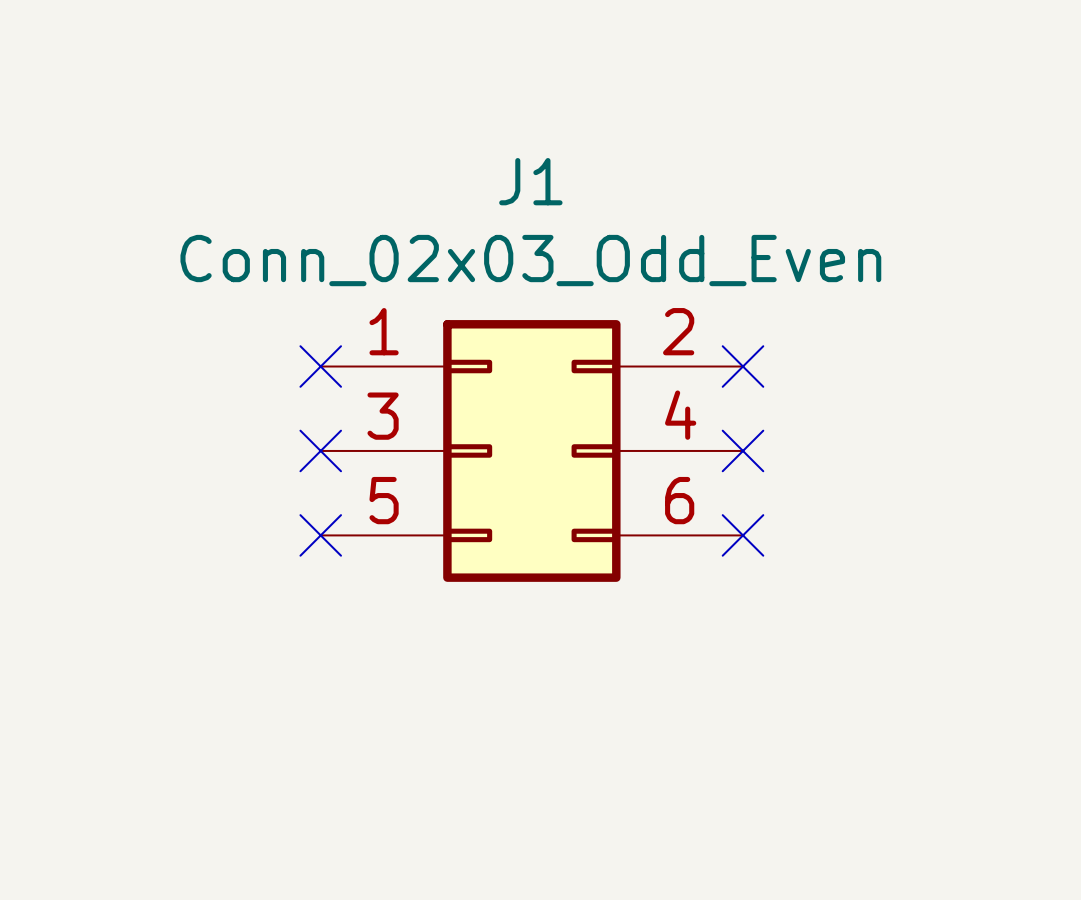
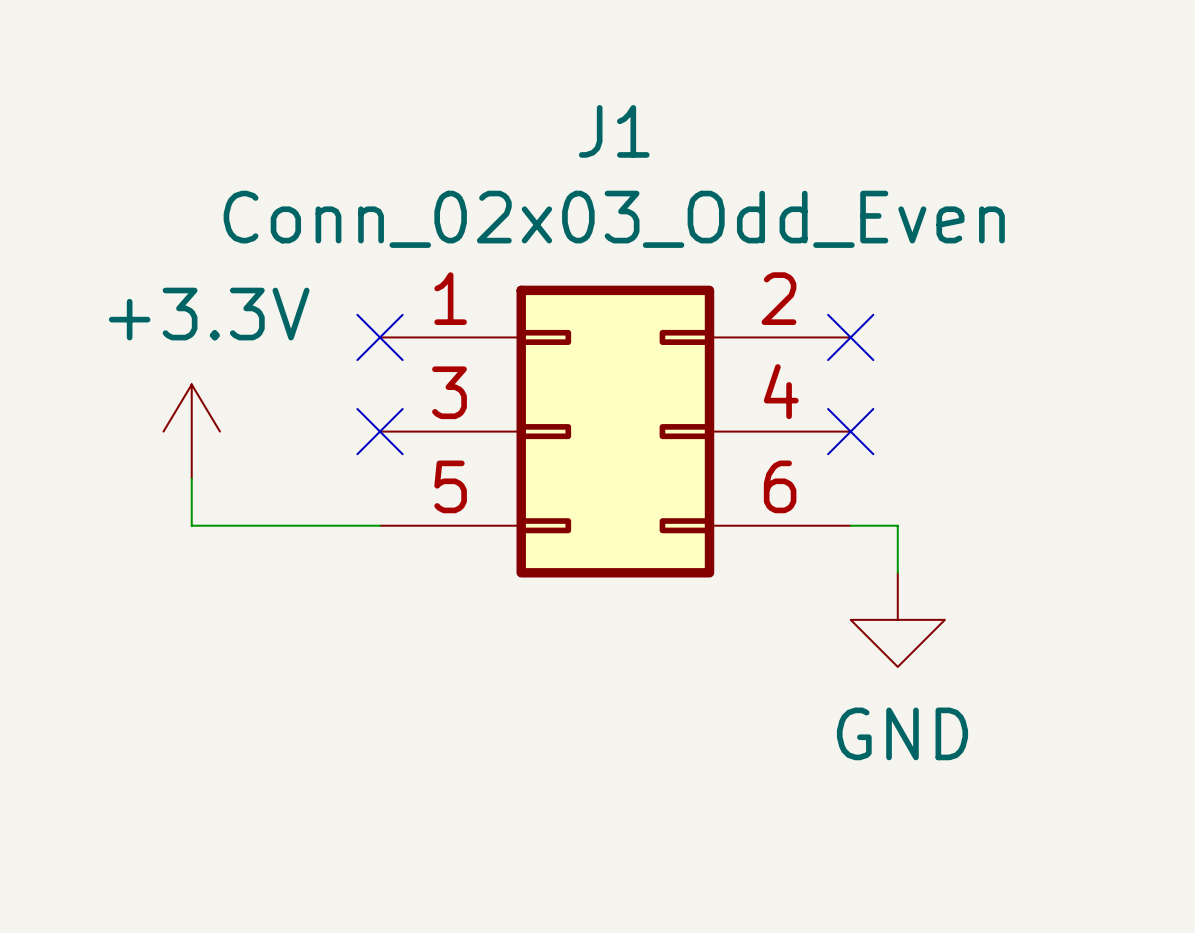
power symbol: none -> +3.3V (191, 431)
wire: none -> (191, 478) (191, 525) (380, 525)
no-connect mark: (320, 535) -> none
wire: none -> (850, 525) (897, 525) (897, 572)
no-connect mark: (743, 535) -> none
power symbol: none -> GND (897, 619)

